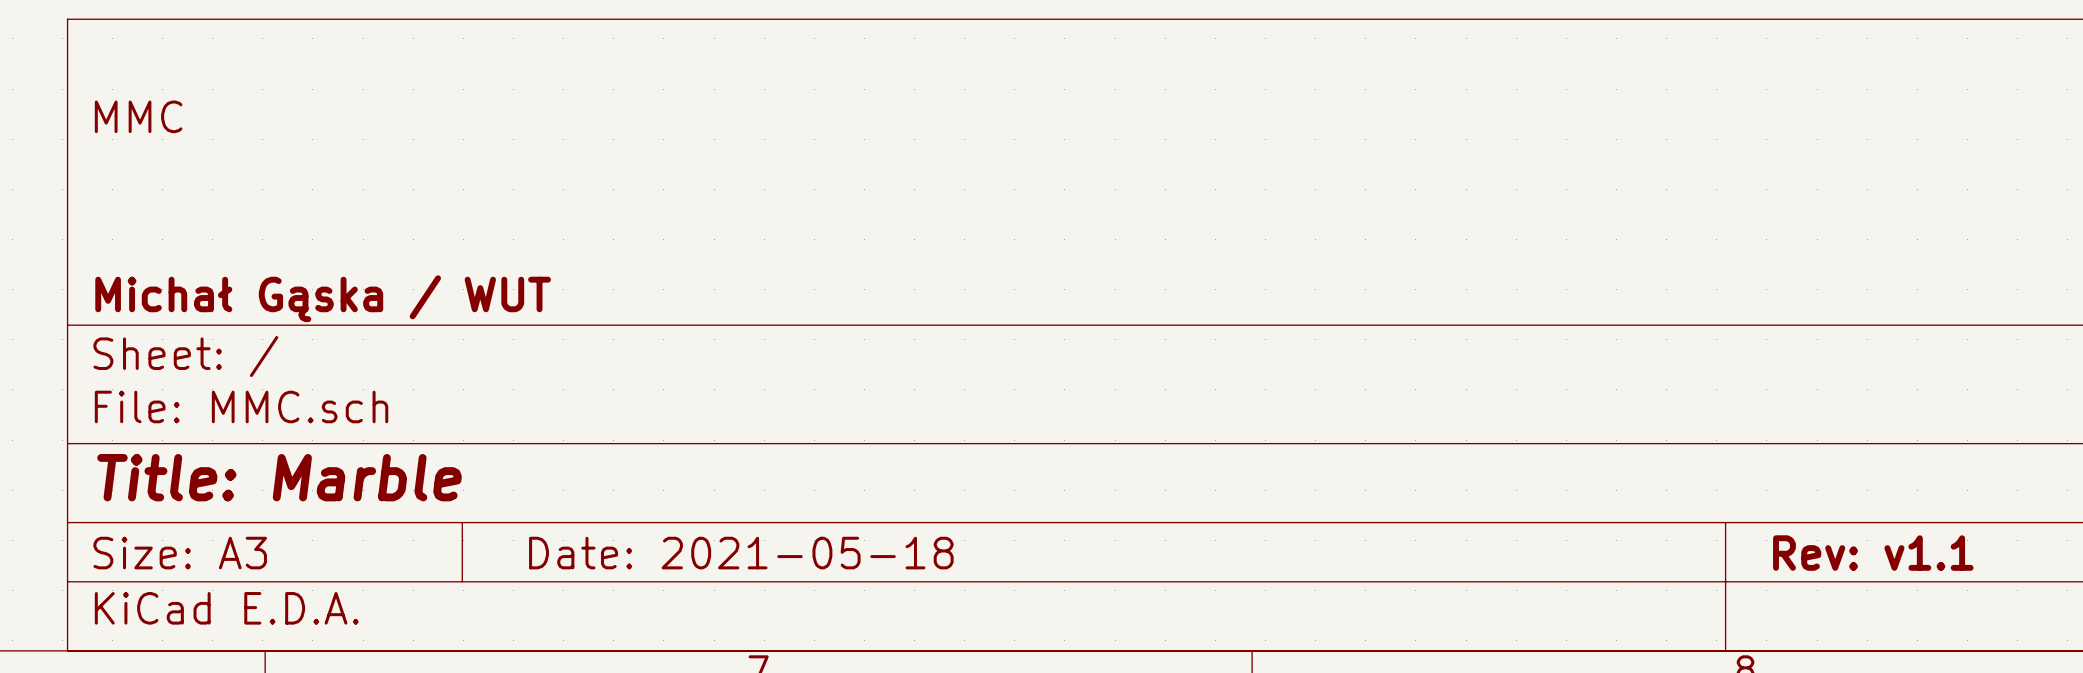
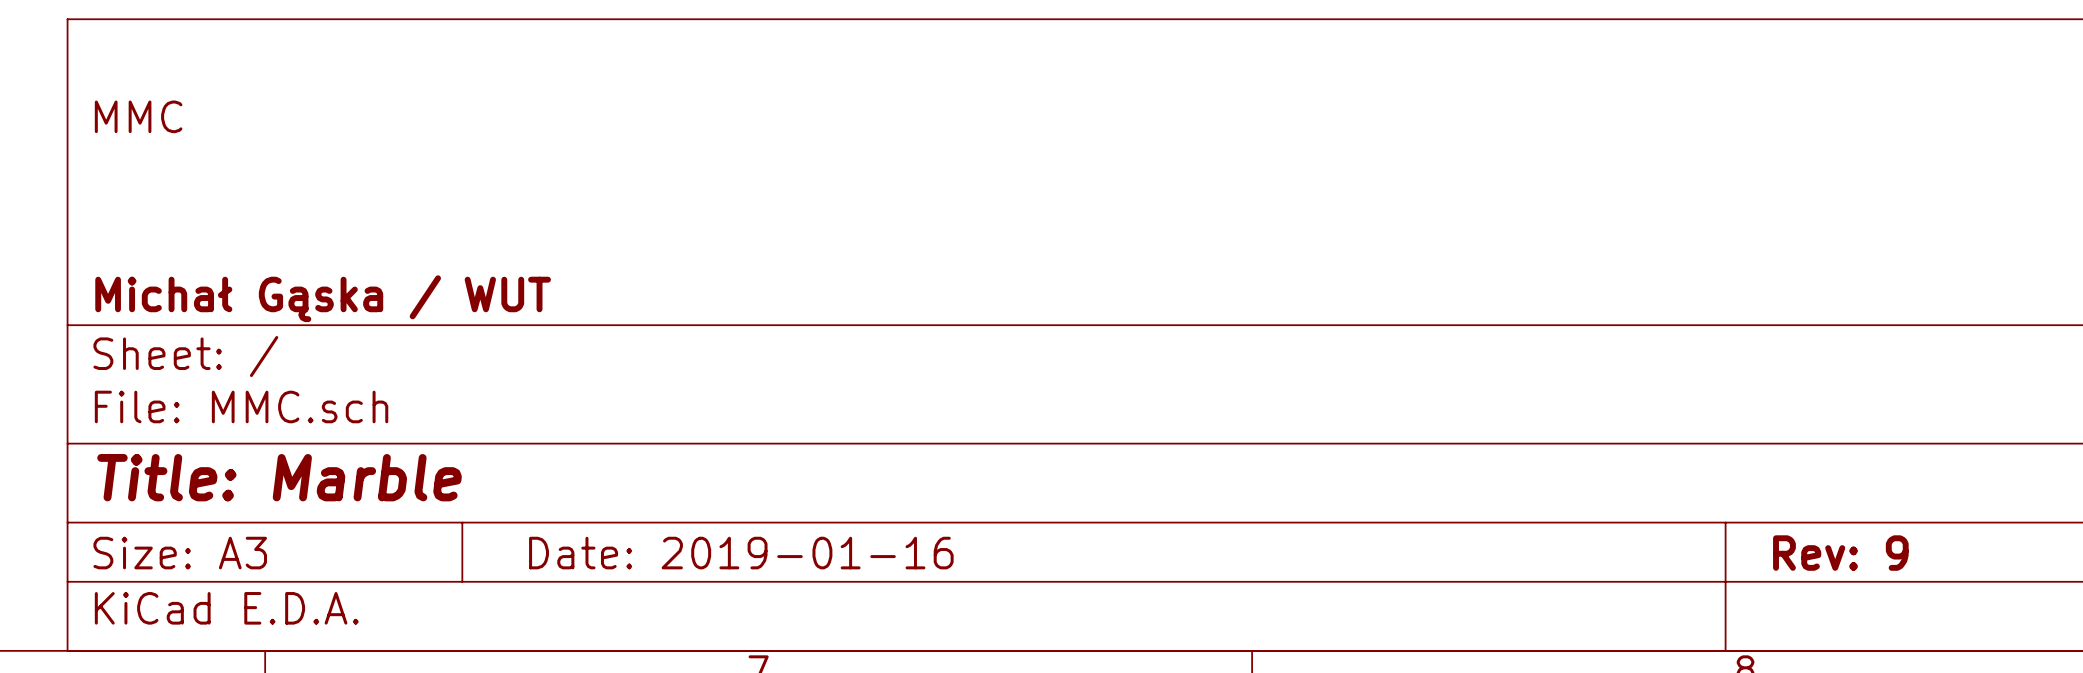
title block: Date: 2021-05-18 (741, 553) -> Date: 2019-01-16 (741, 553)
title block: Rev: v1.1 (1873, 553) -> Rev: 9 (1840, 553)

